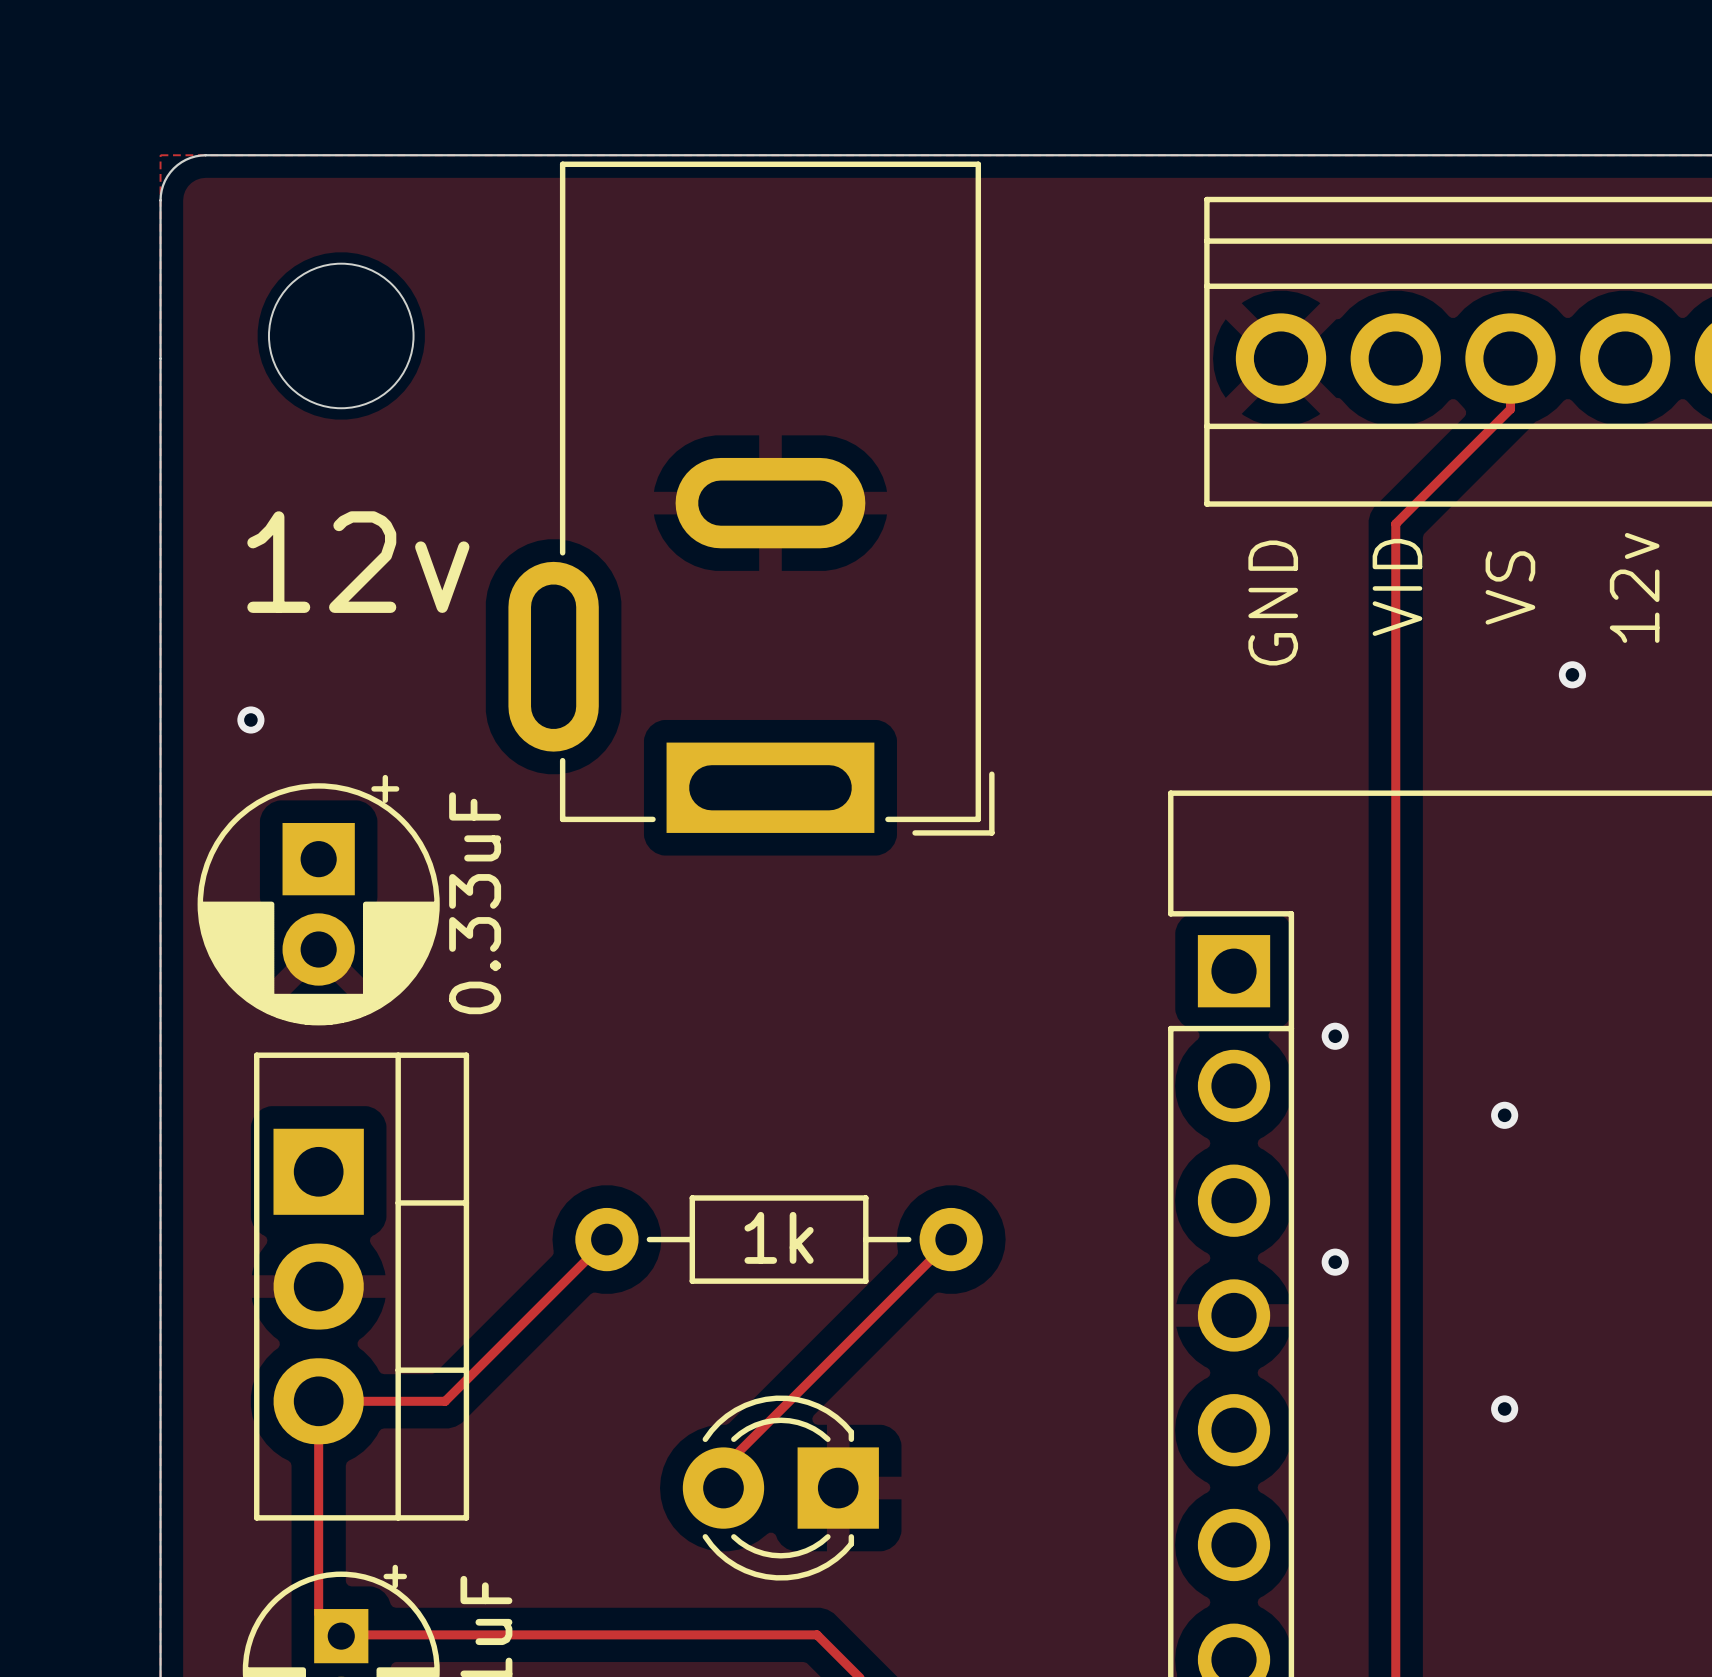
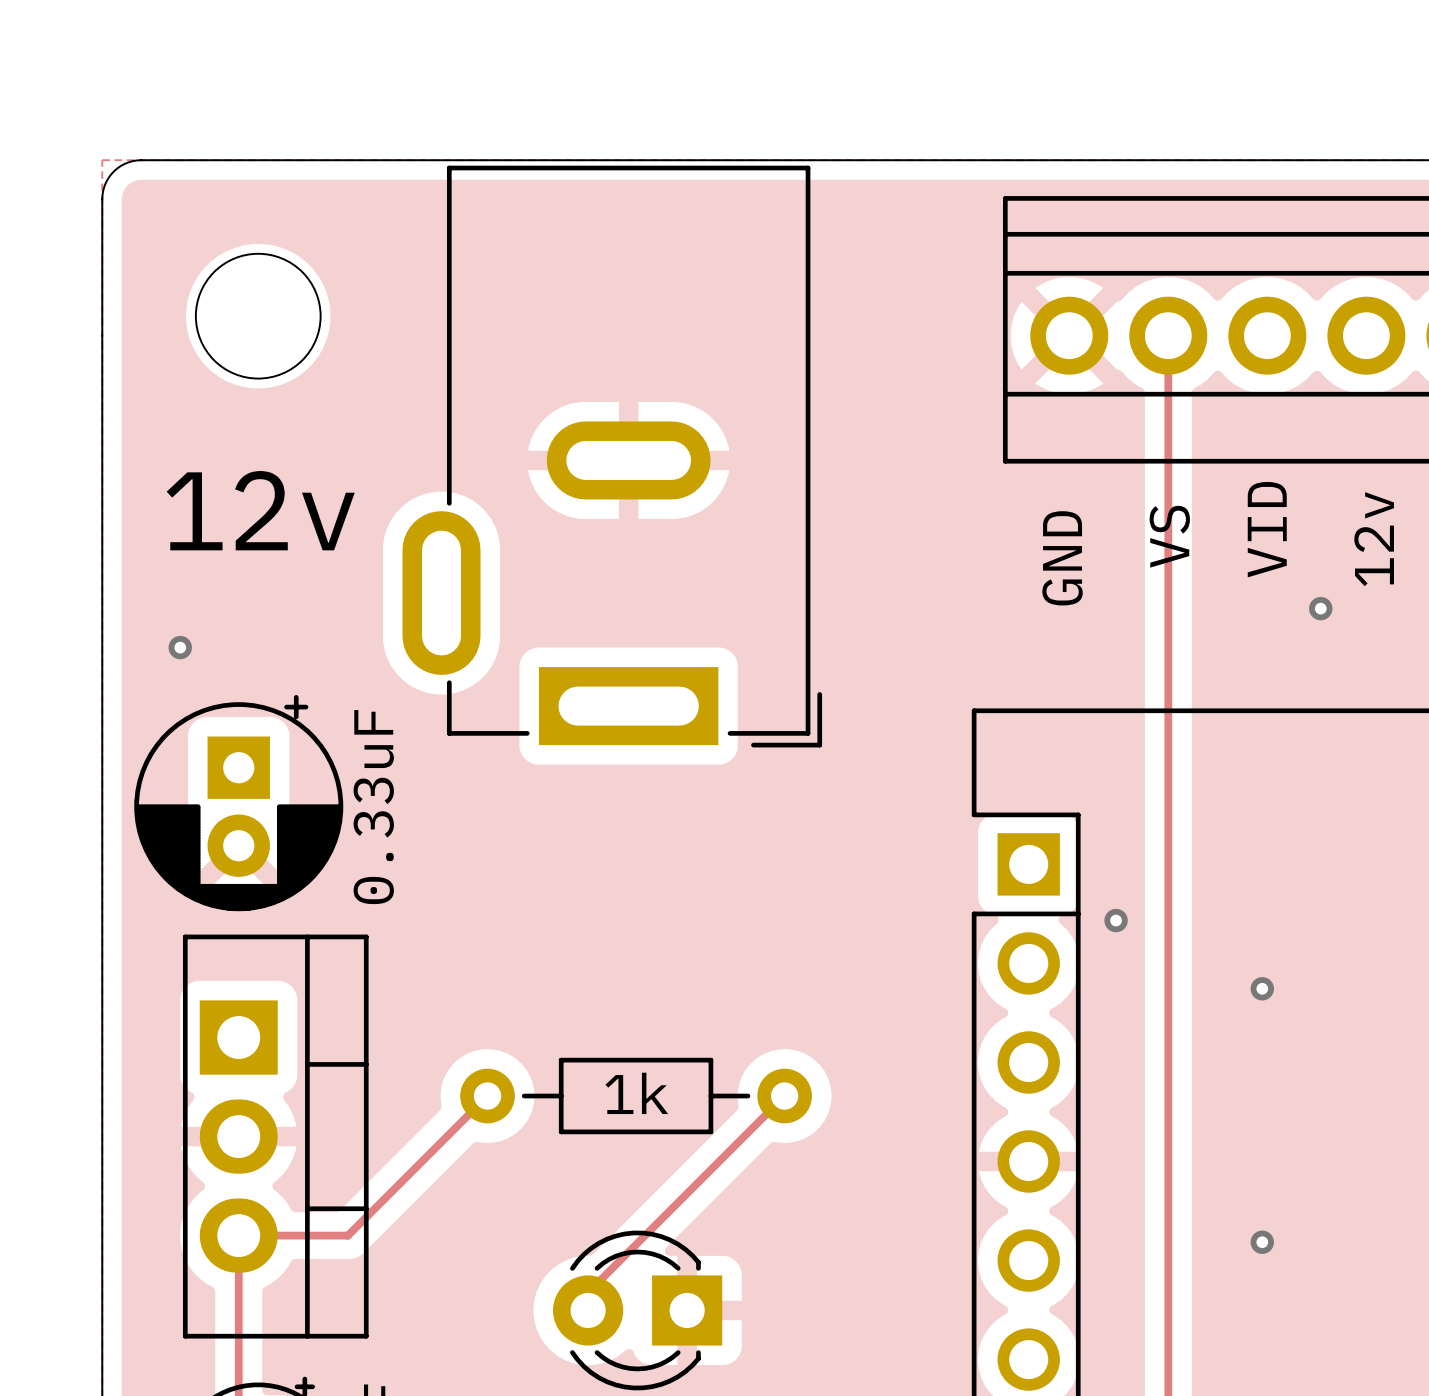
track: (1510, 358) (1510, 409) (1395, 523) -> (1168, 335) (1168, 478)
text position: VID (1397, 587) -> VID (1267, 529)
text position: VS (1510, 587) -> VS (1169, 536)
via: (1335, 1262) -> none

